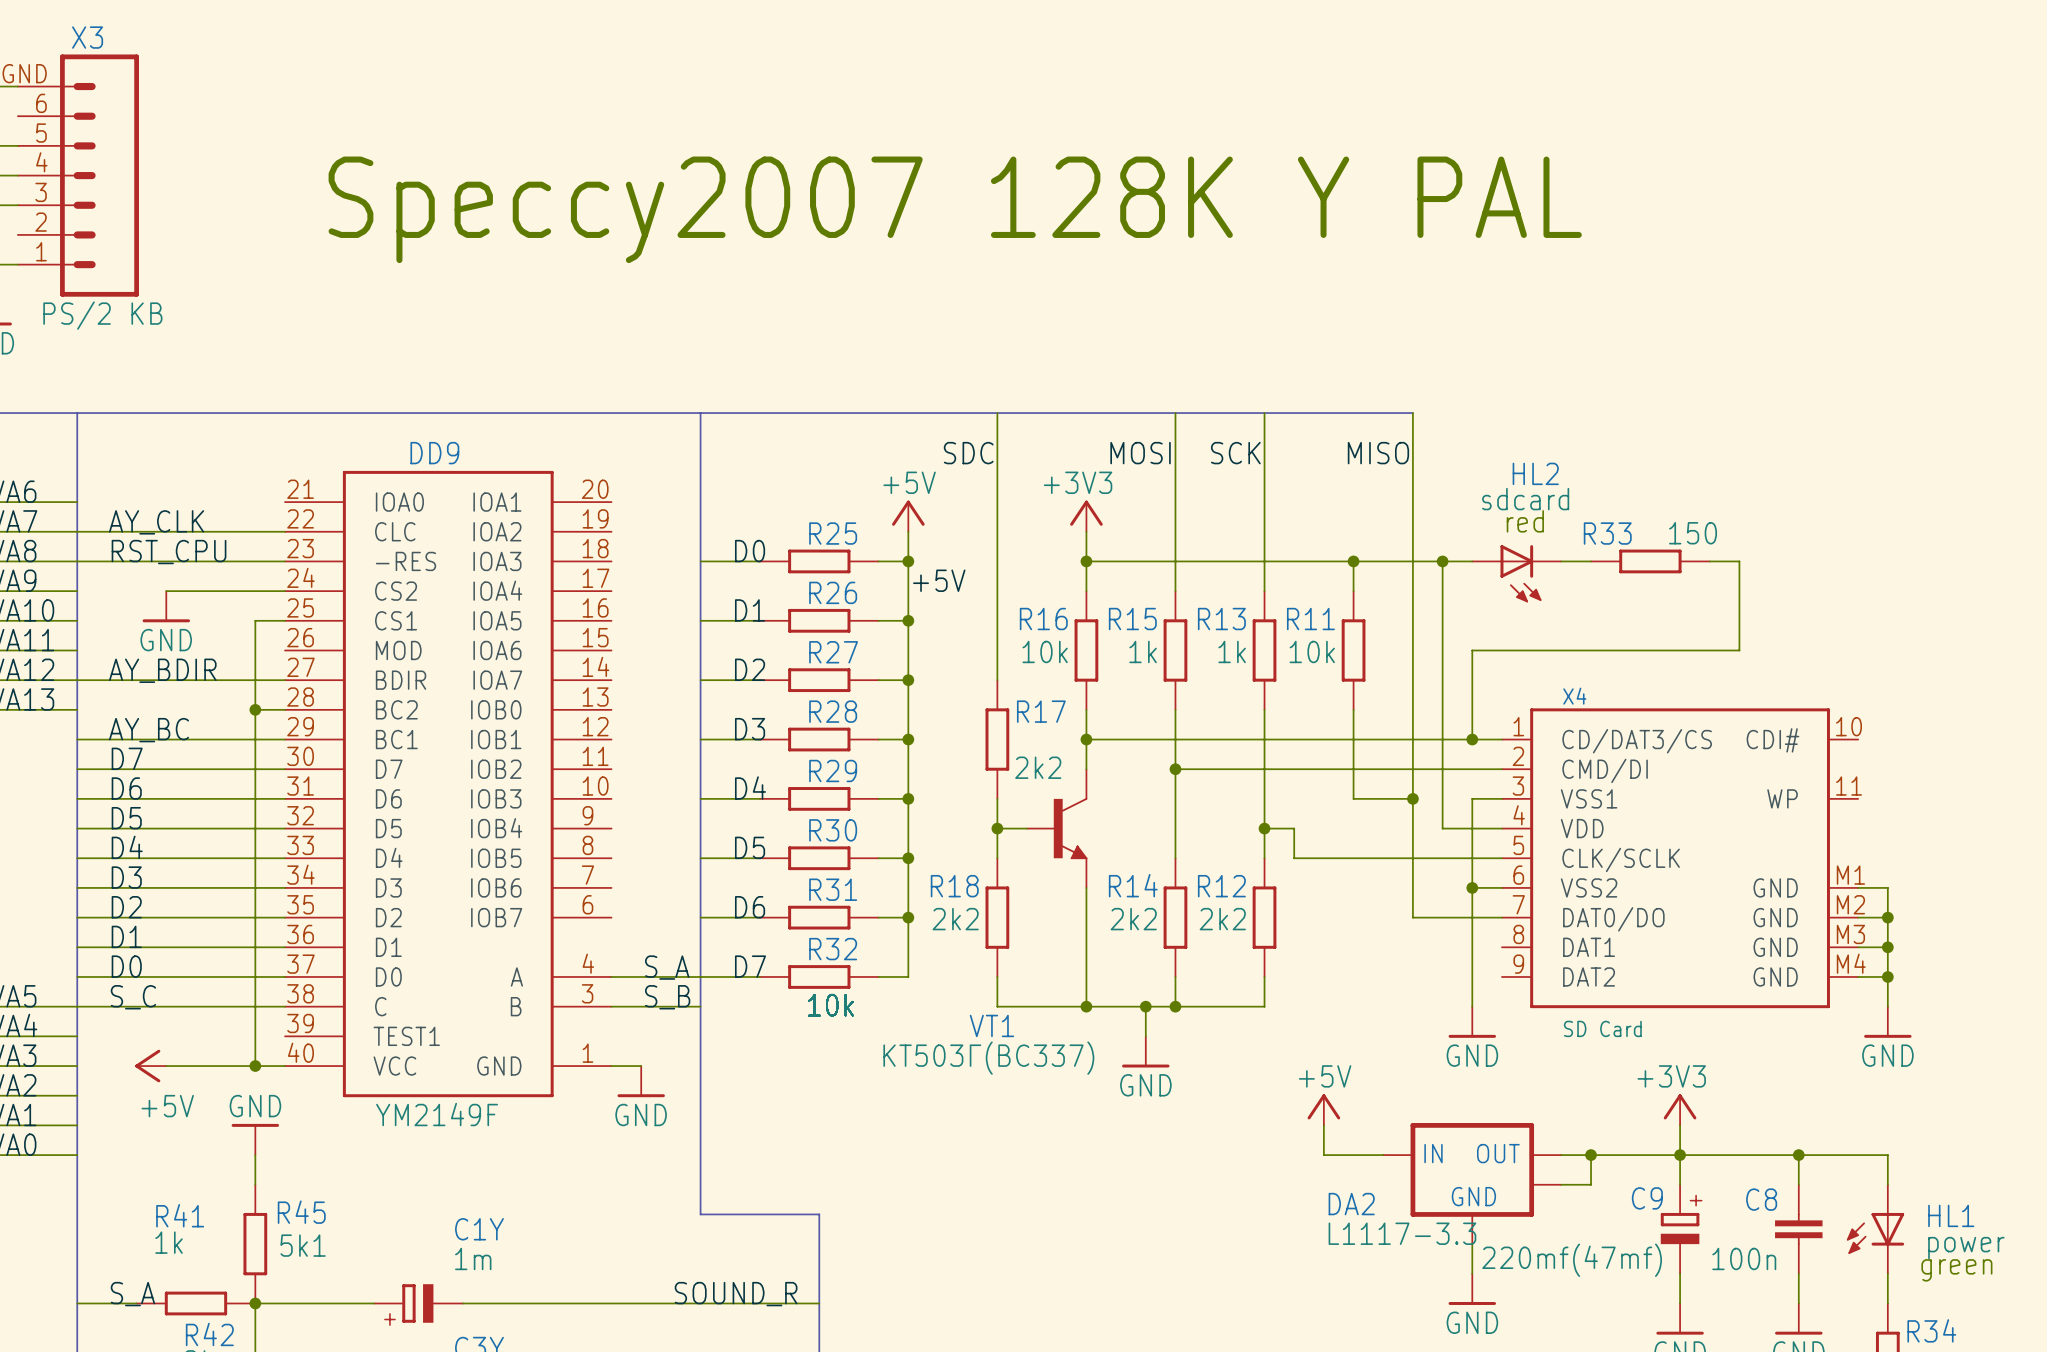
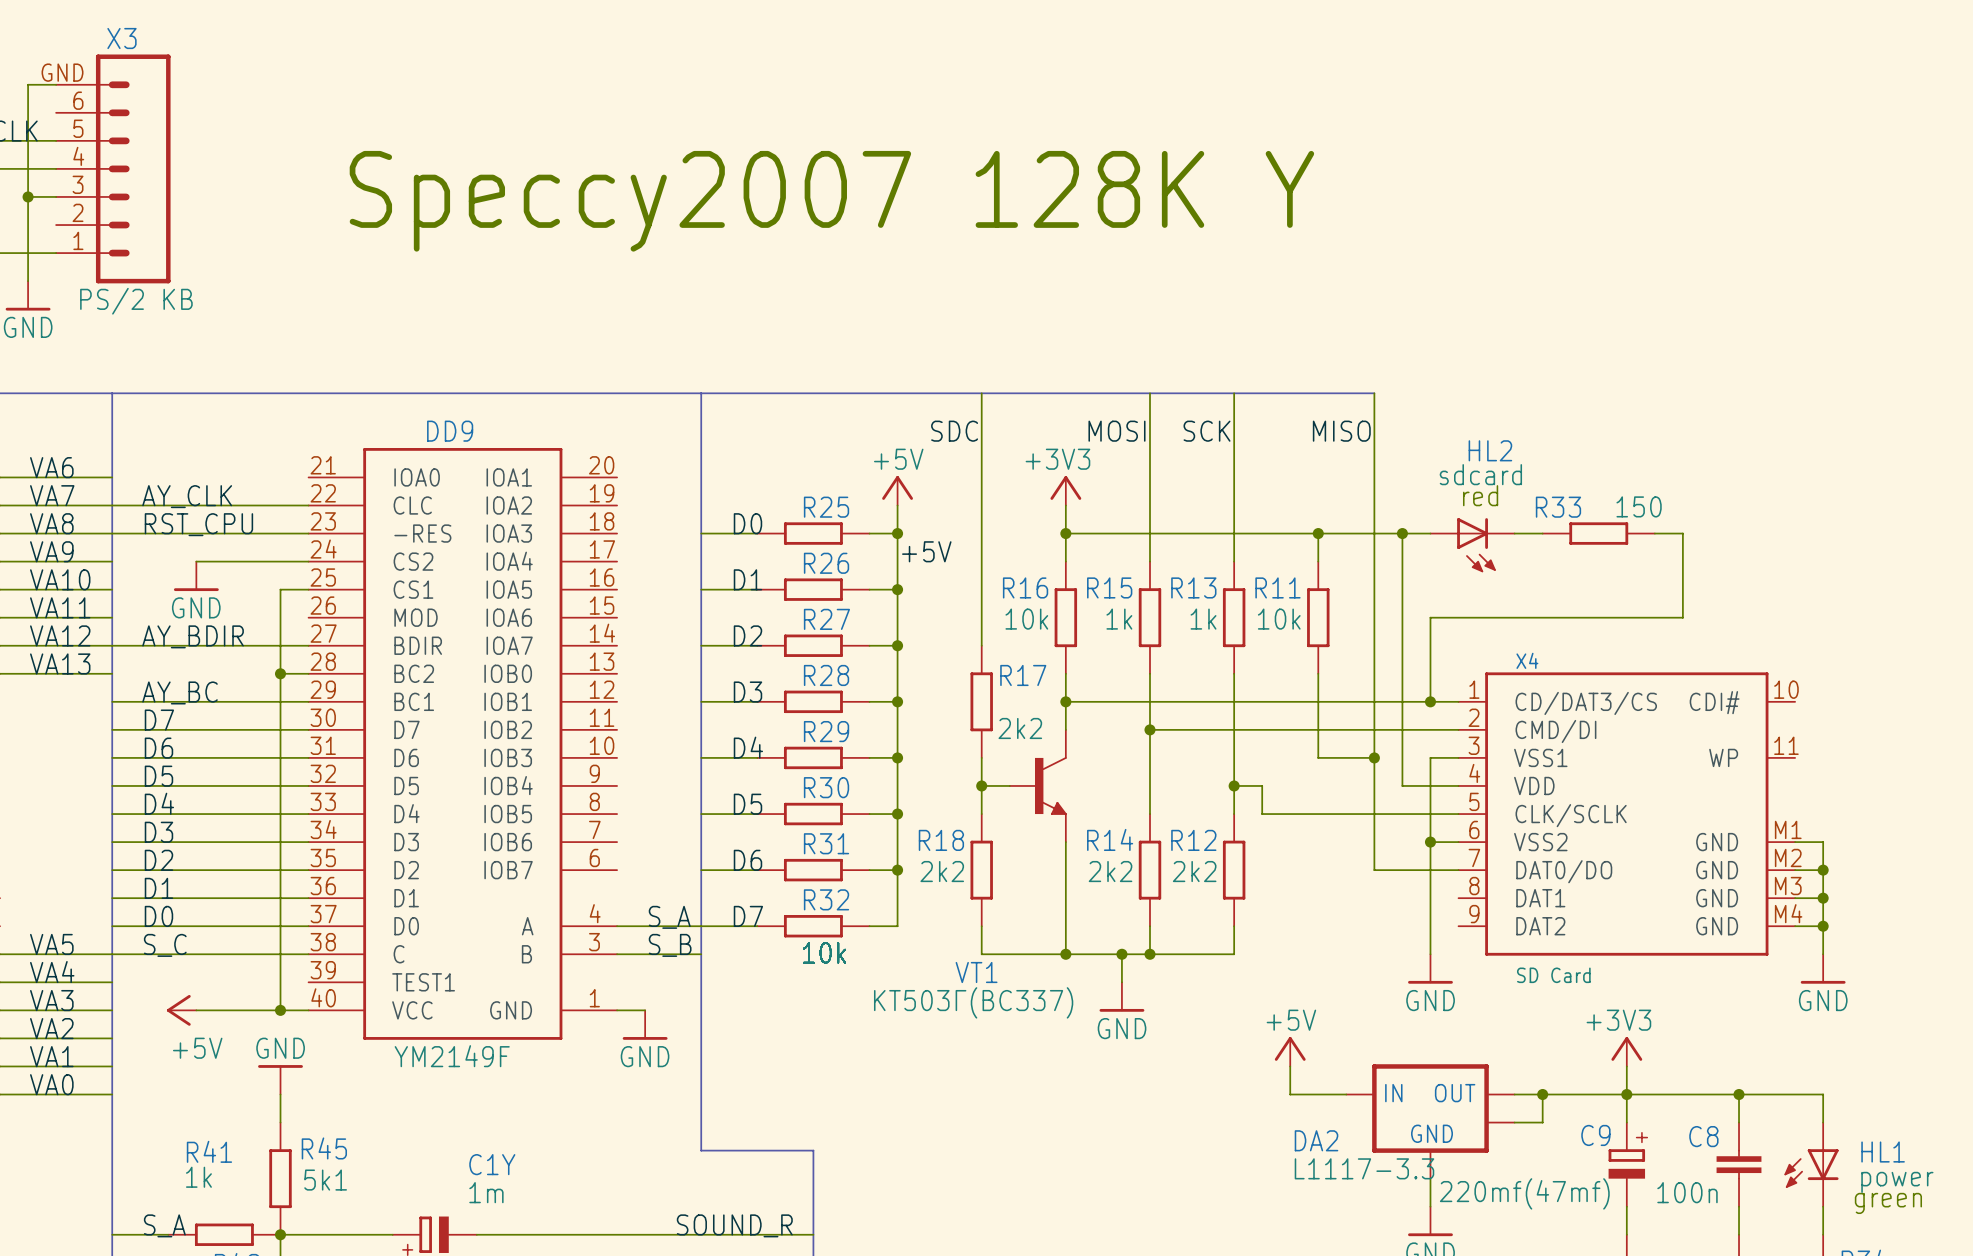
text: Speccy2007 128K Y PAL (955, 209) -> Speccy2007 128K Y (831, 201)

